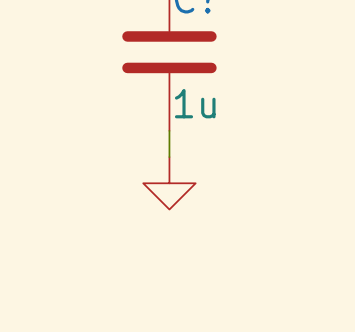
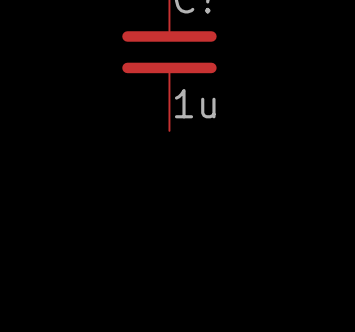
wire: (169, 130) (169, 157) -> none
power symbol: (169, 183) -> none

